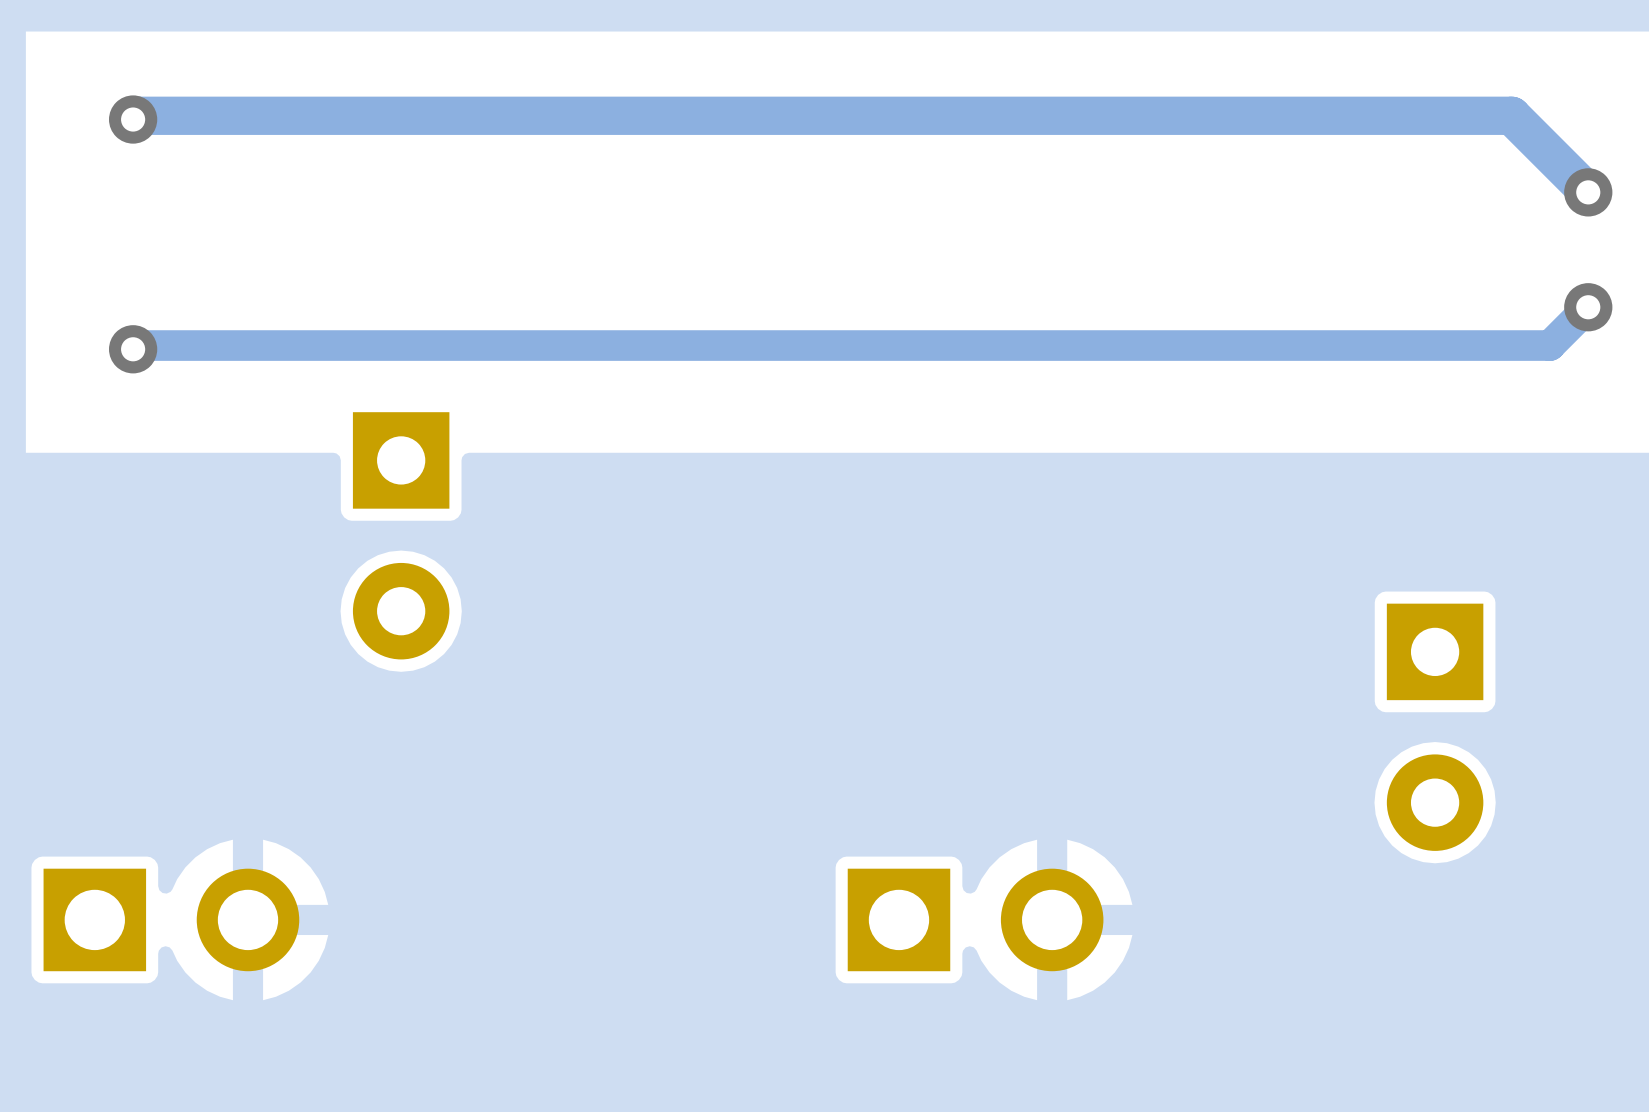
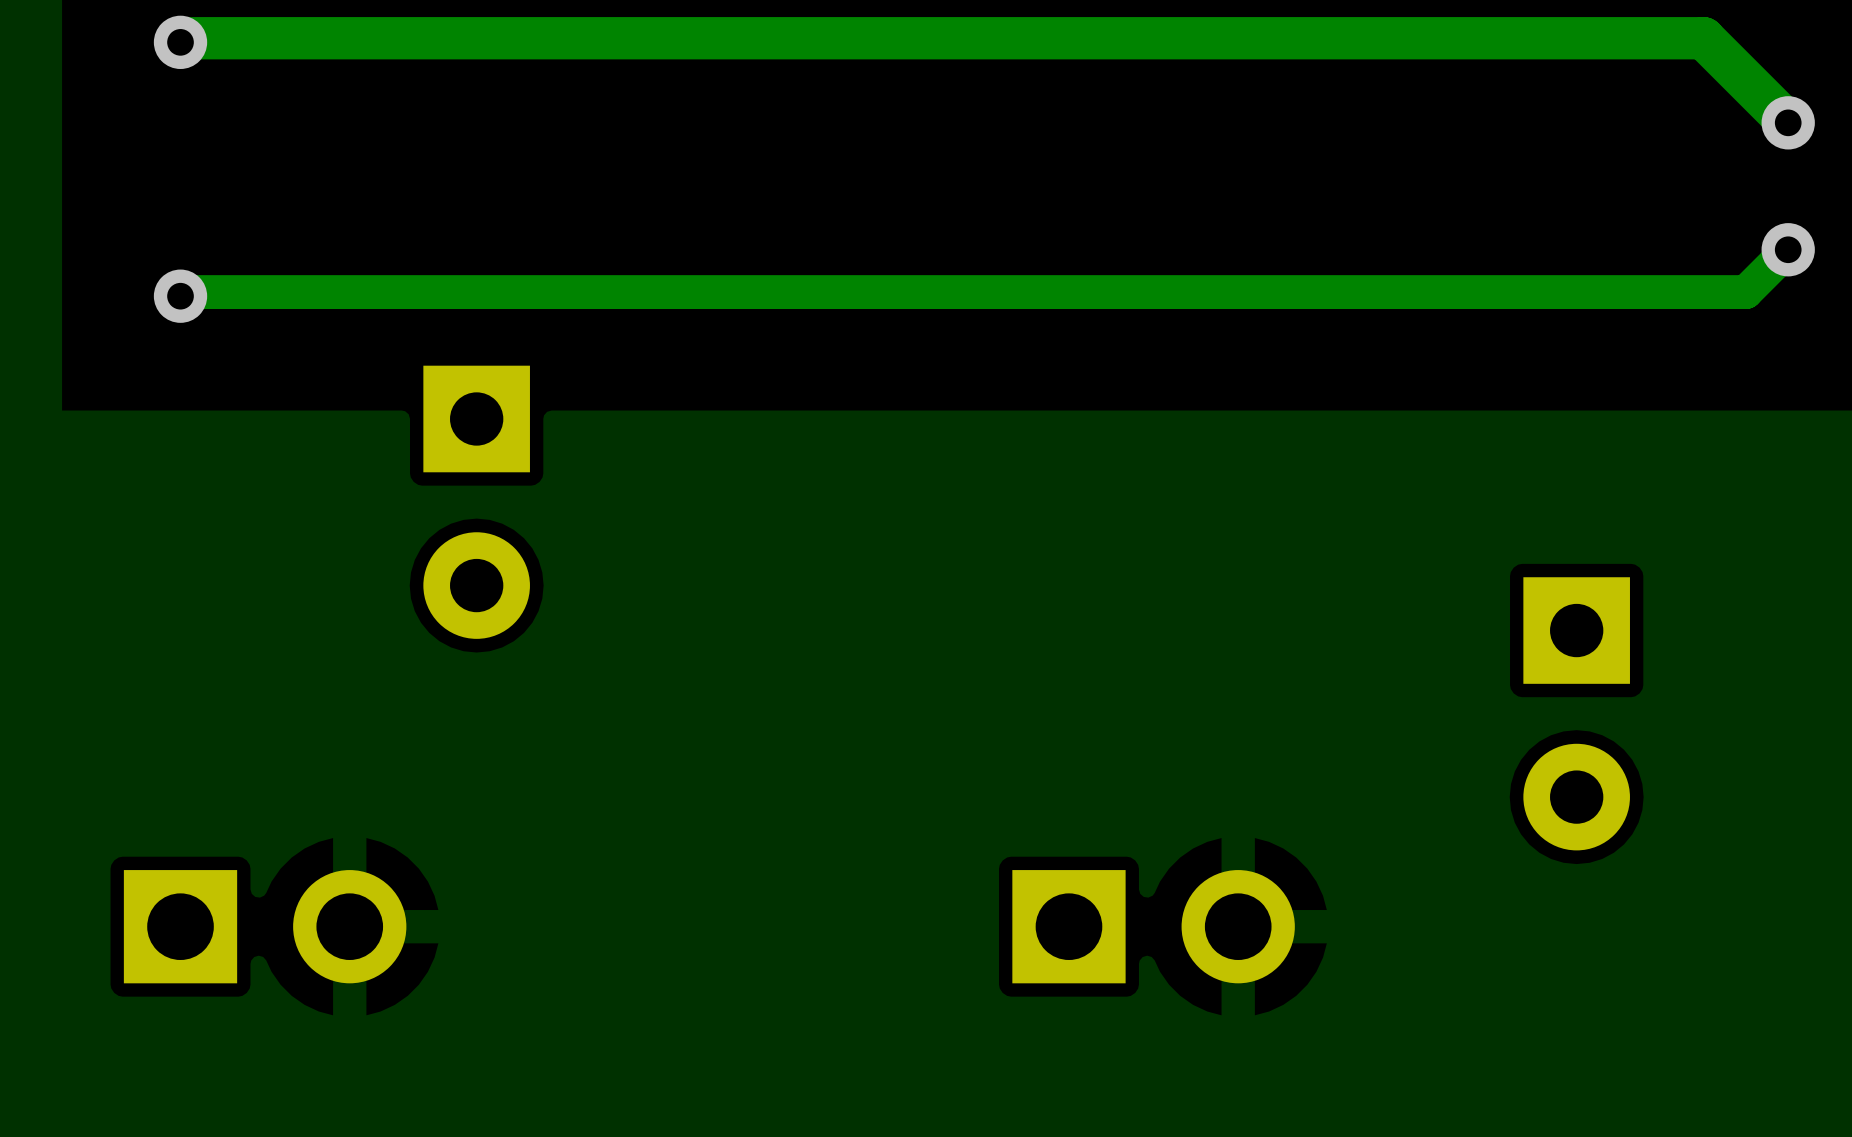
part position: (1435, 727) -> (1576, 713)
part position: (171, 919) -> (265, 926)
part position: (975, 919) -> (1153, 926)

